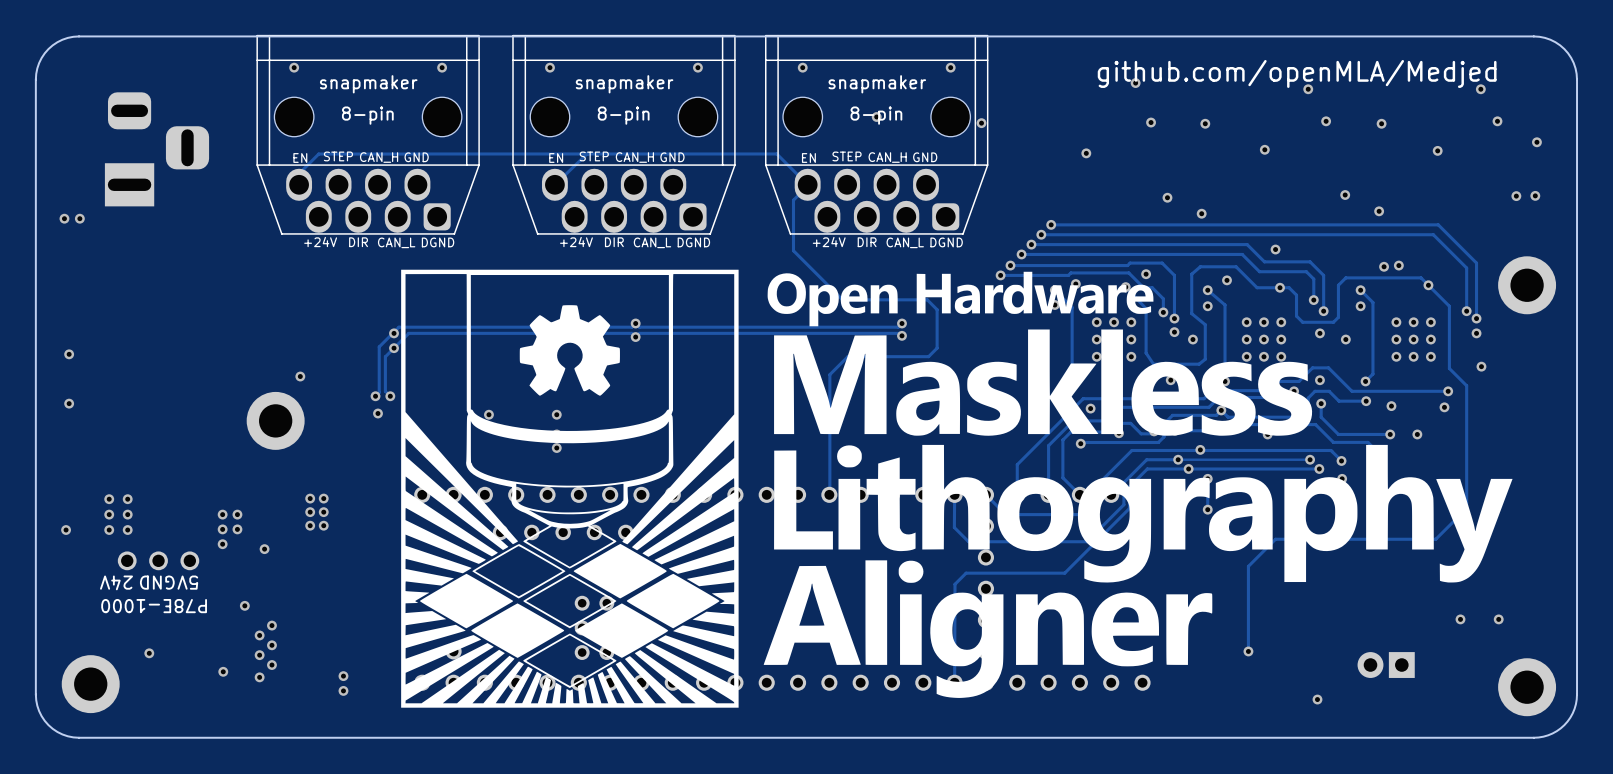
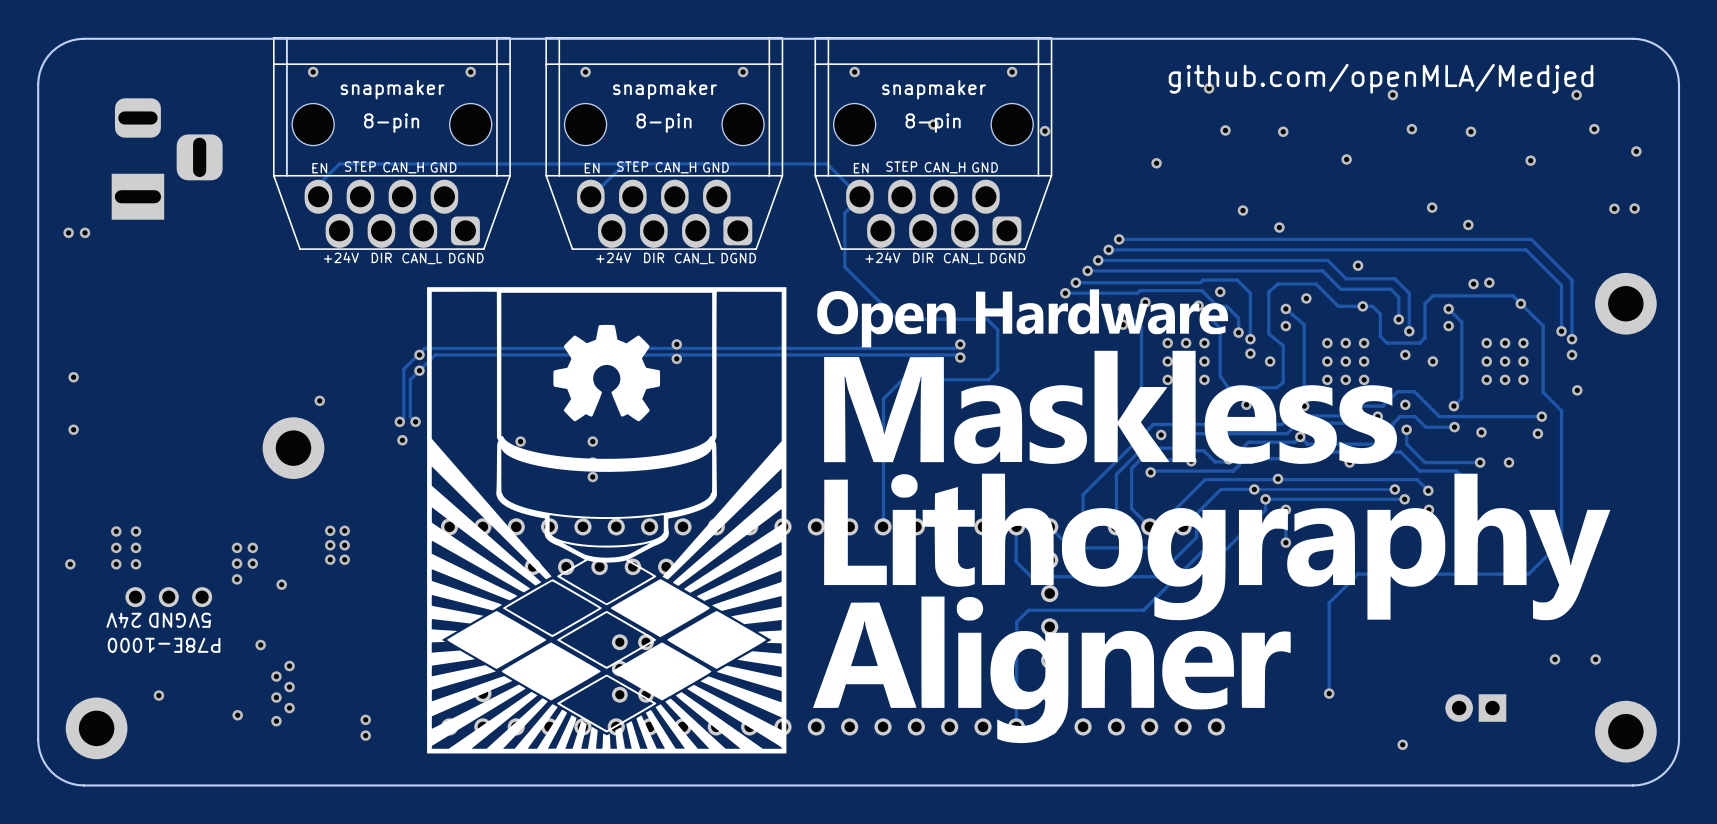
track: (1188, 468) (1147, 468) (1129, 486) (1129, 508) (1064, 573) -> (1265, 499) (1265, 510) (1226, 548) (1205, 548) (1143, 610) (1133, 610)

